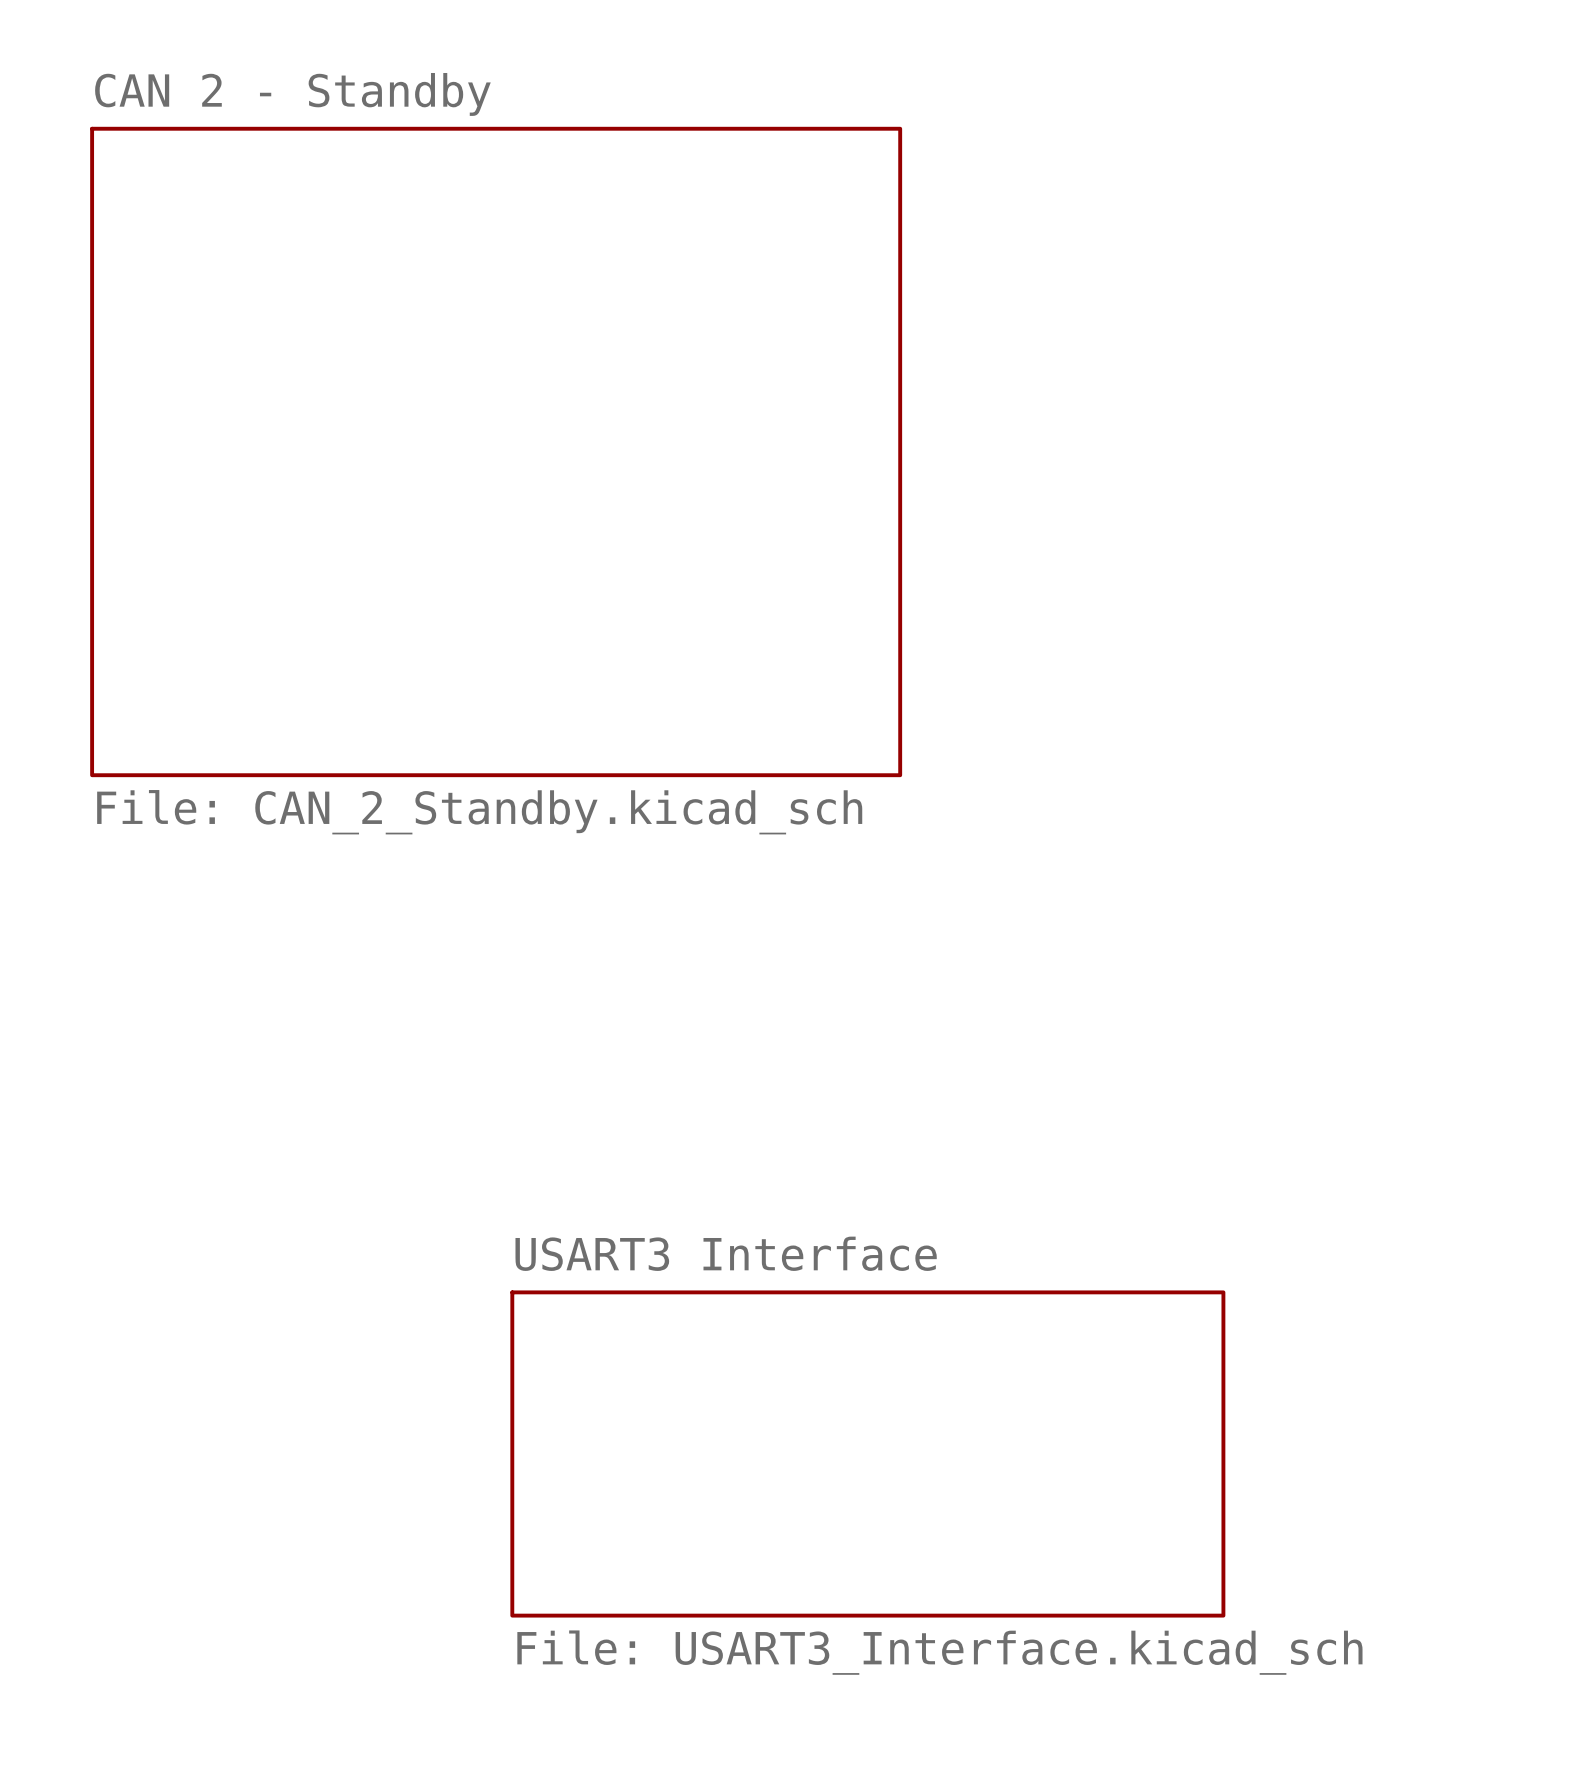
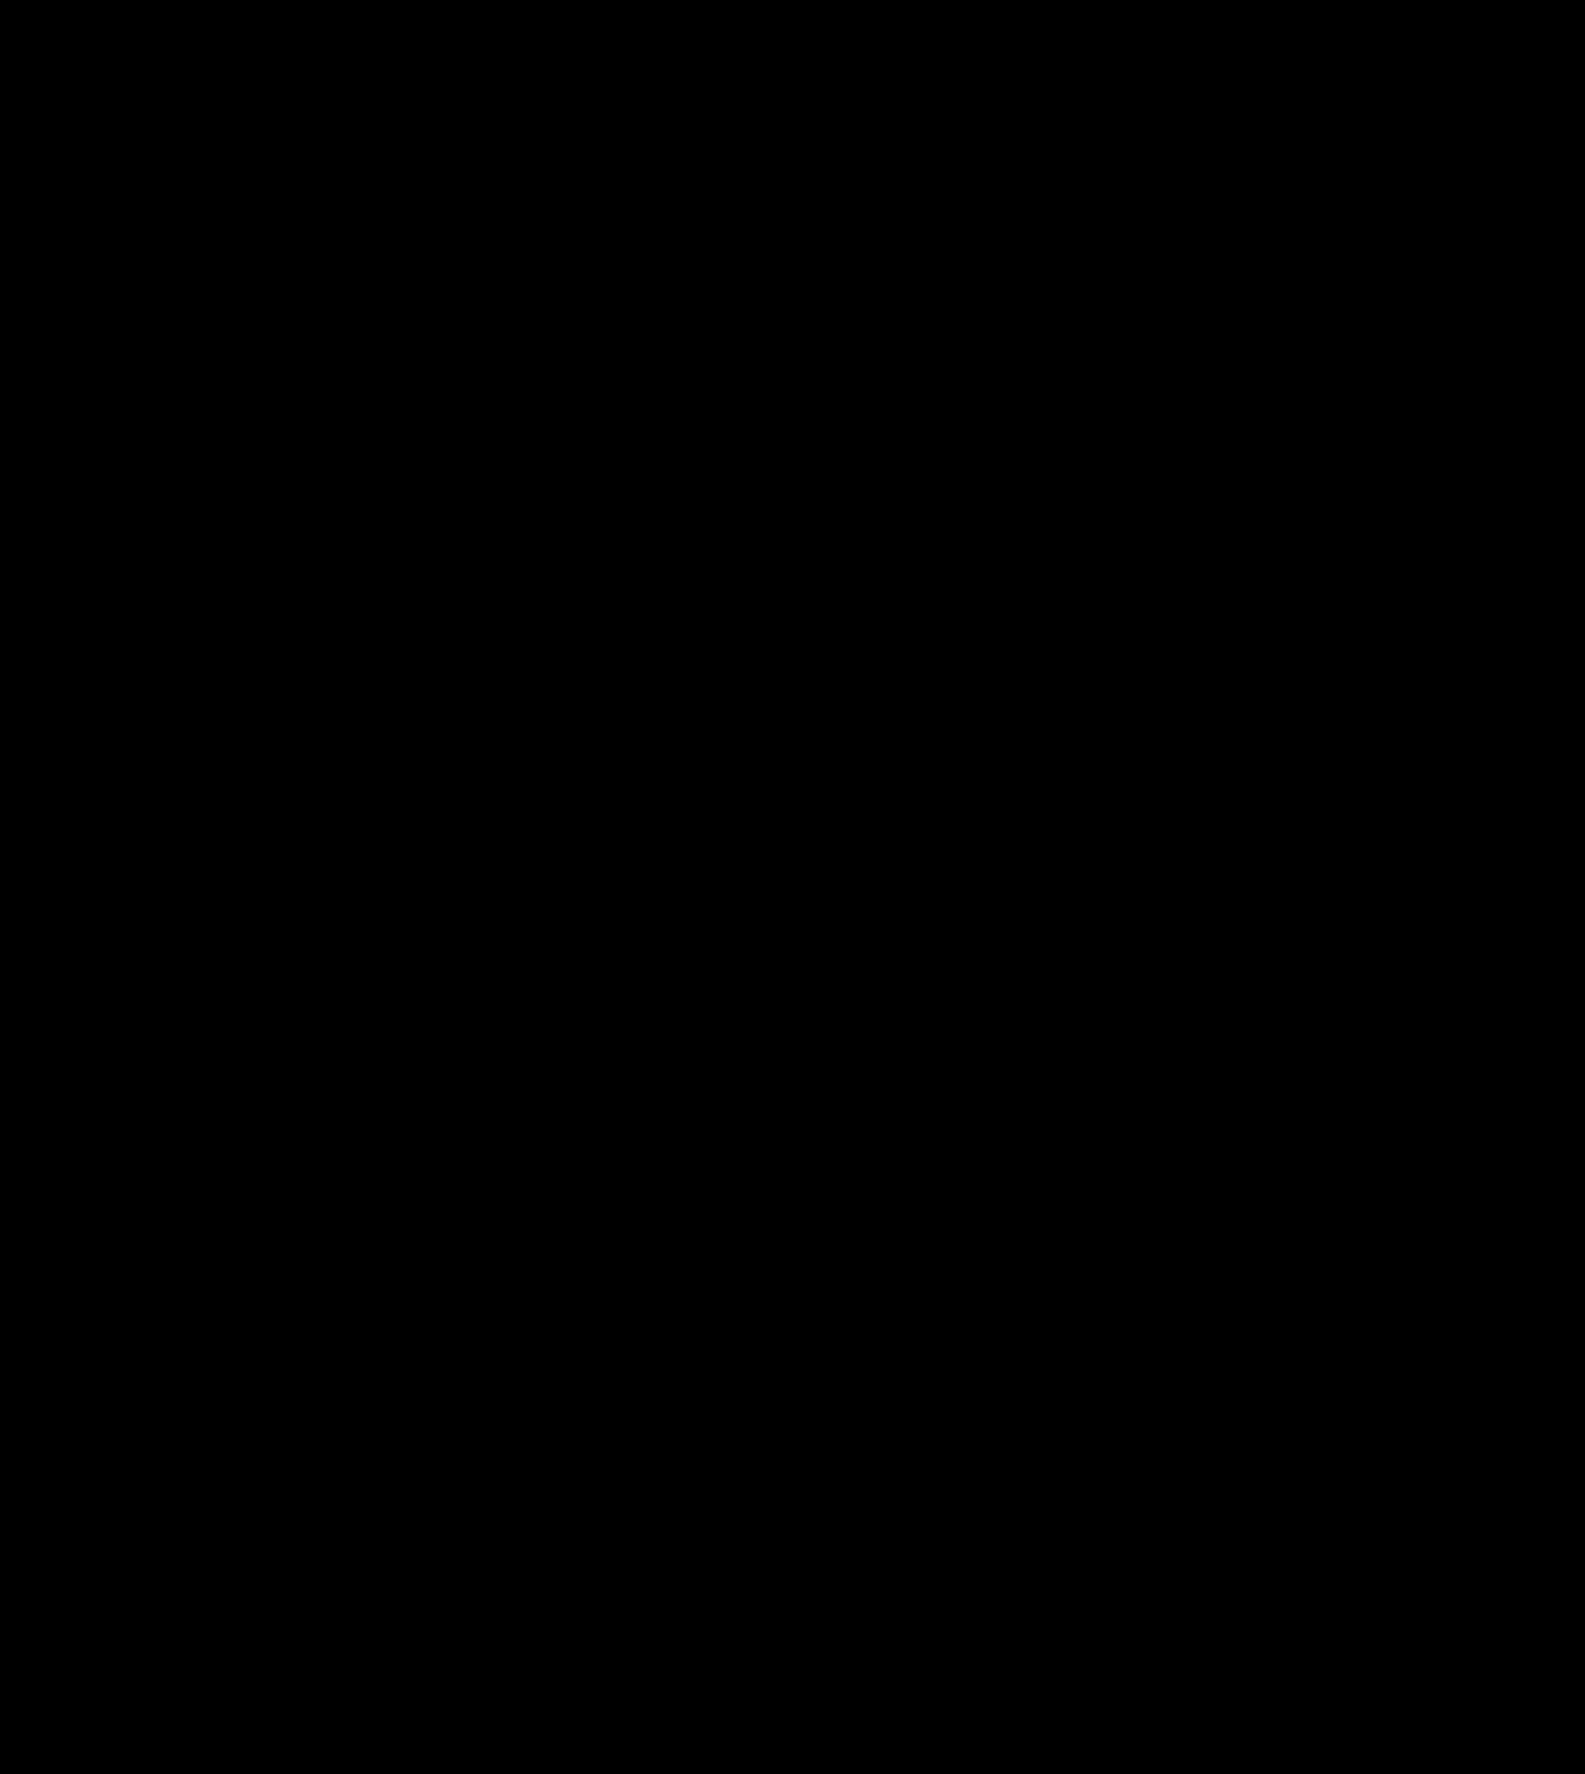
sheet CAN 2 - Standby: File: CAN_2_Standby.kicad_sch (496, 451) -> none
sheet USART3 Interface: File: USART3_Interface.kicad_sch (867, 1454) -> none

